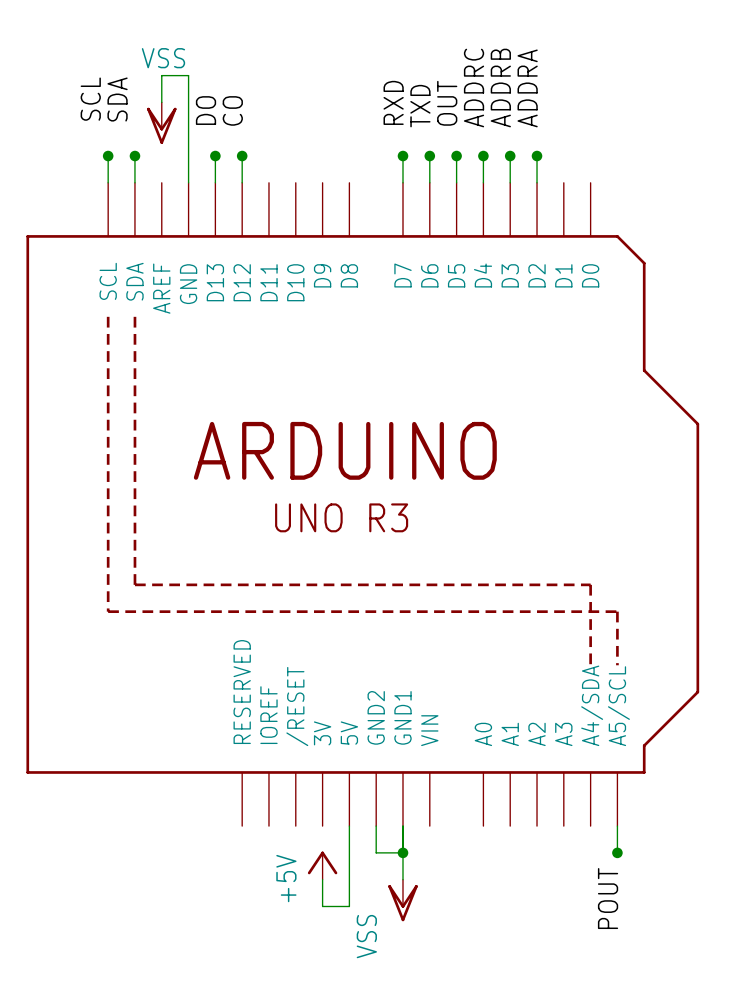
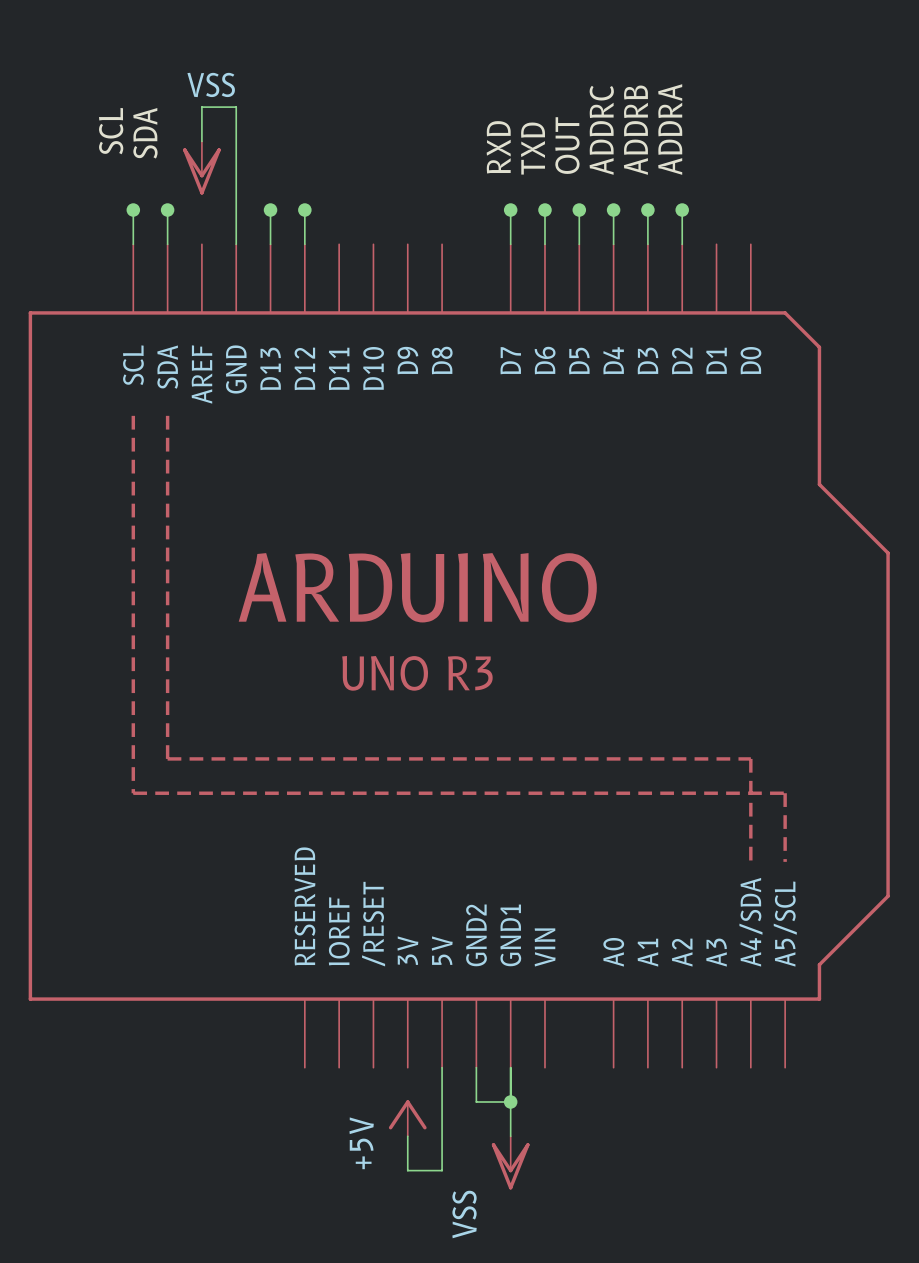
label: DO (206, 110) -> none
label: CO (232, 110) -> none
wire: (617, 826) (617, 852) -> none
junction: (617, 852) -> none
label: POUT (608, 898) -> none

